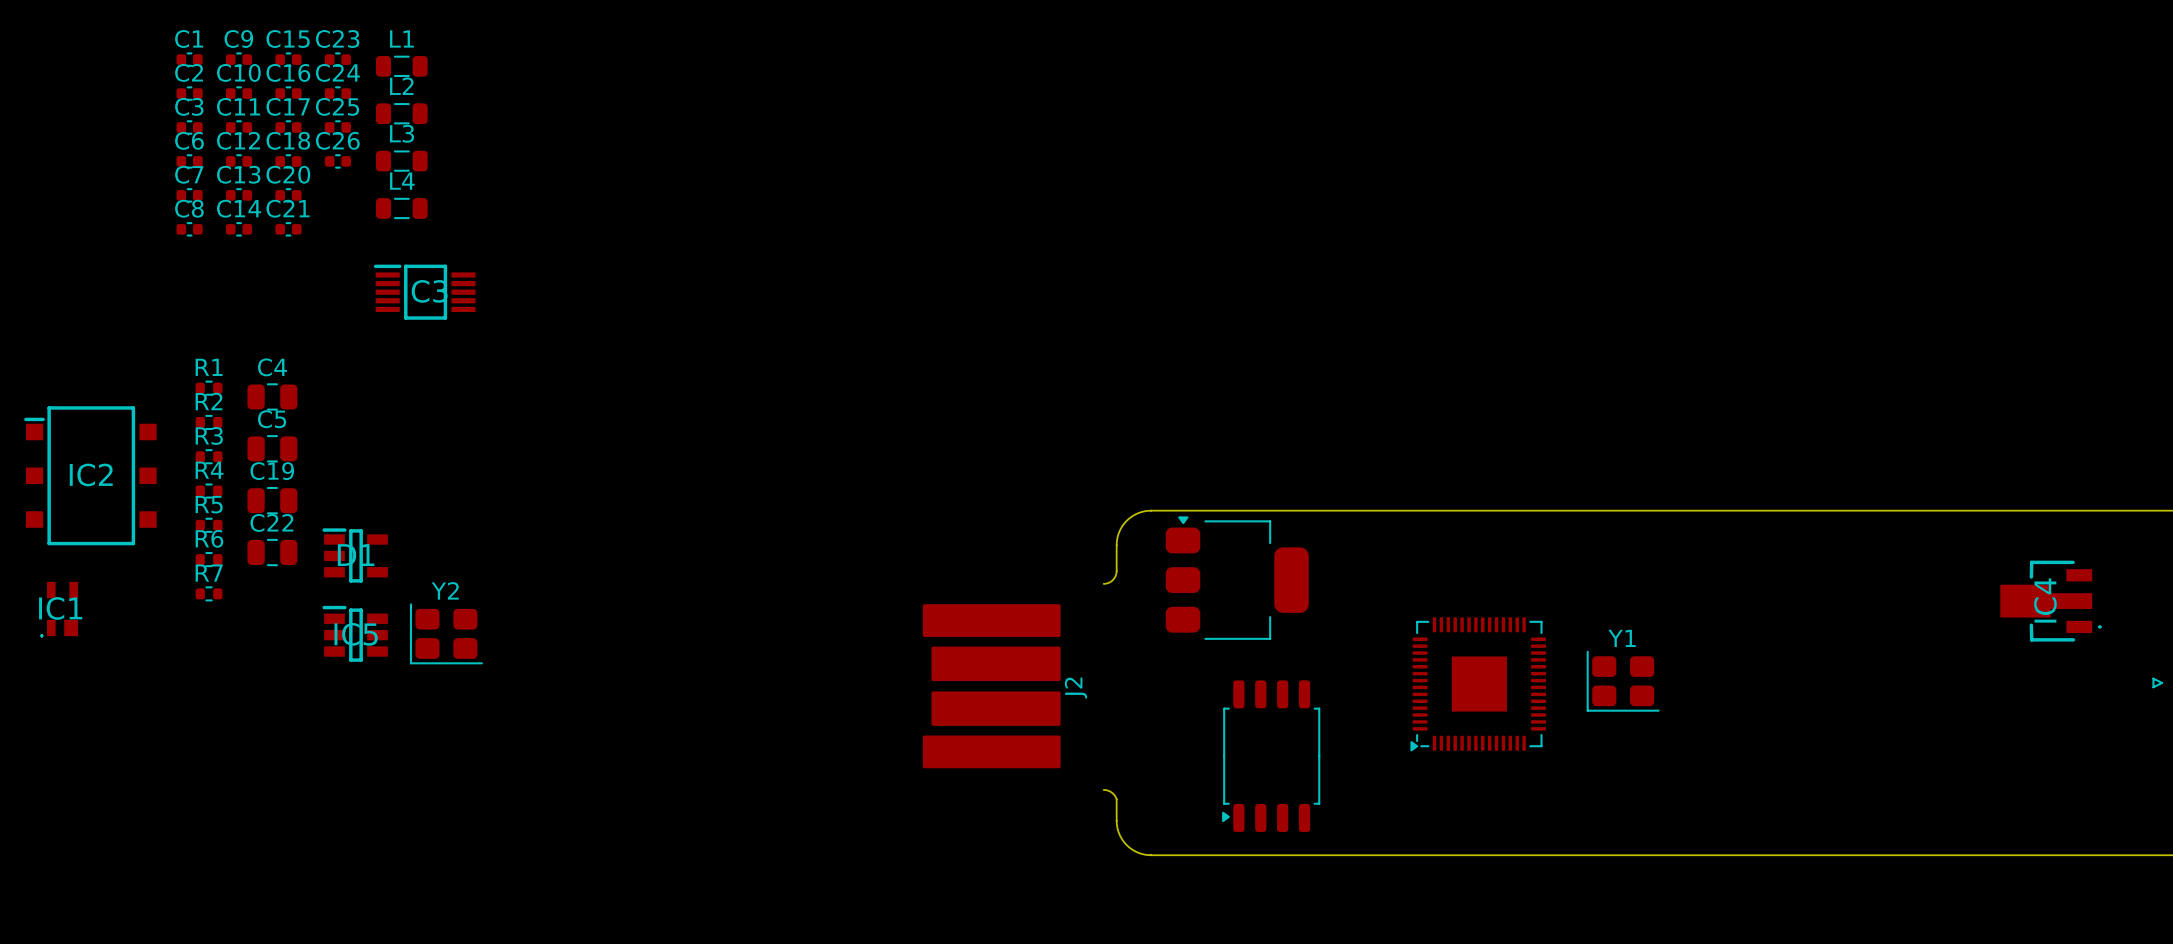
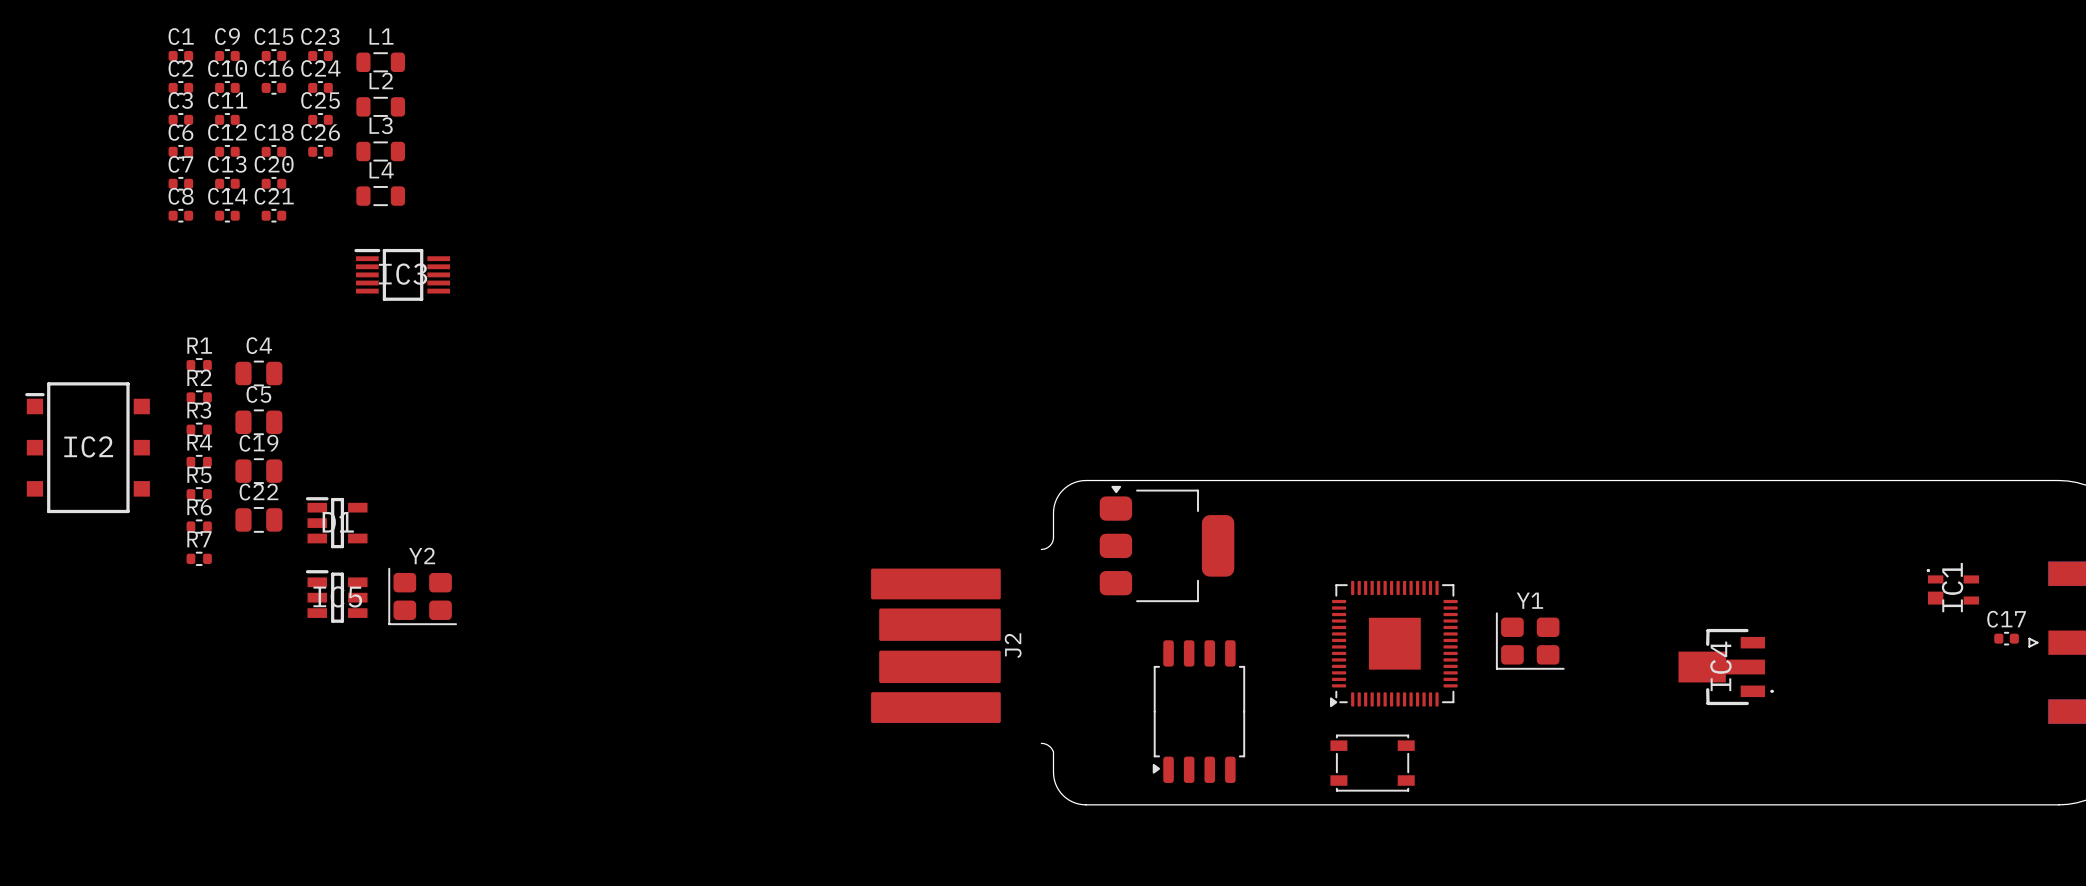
C17 position: (288, 127) -> (2006, 638)
IC4 position: (2050, 601) -> (1726, 667)
IC1 rotation: 0° (59, 609) -> 90° clockwise (1952, 586)
IC1 position: (59, 609) -> (1952, 586)
part: none -> (1372, 763)

